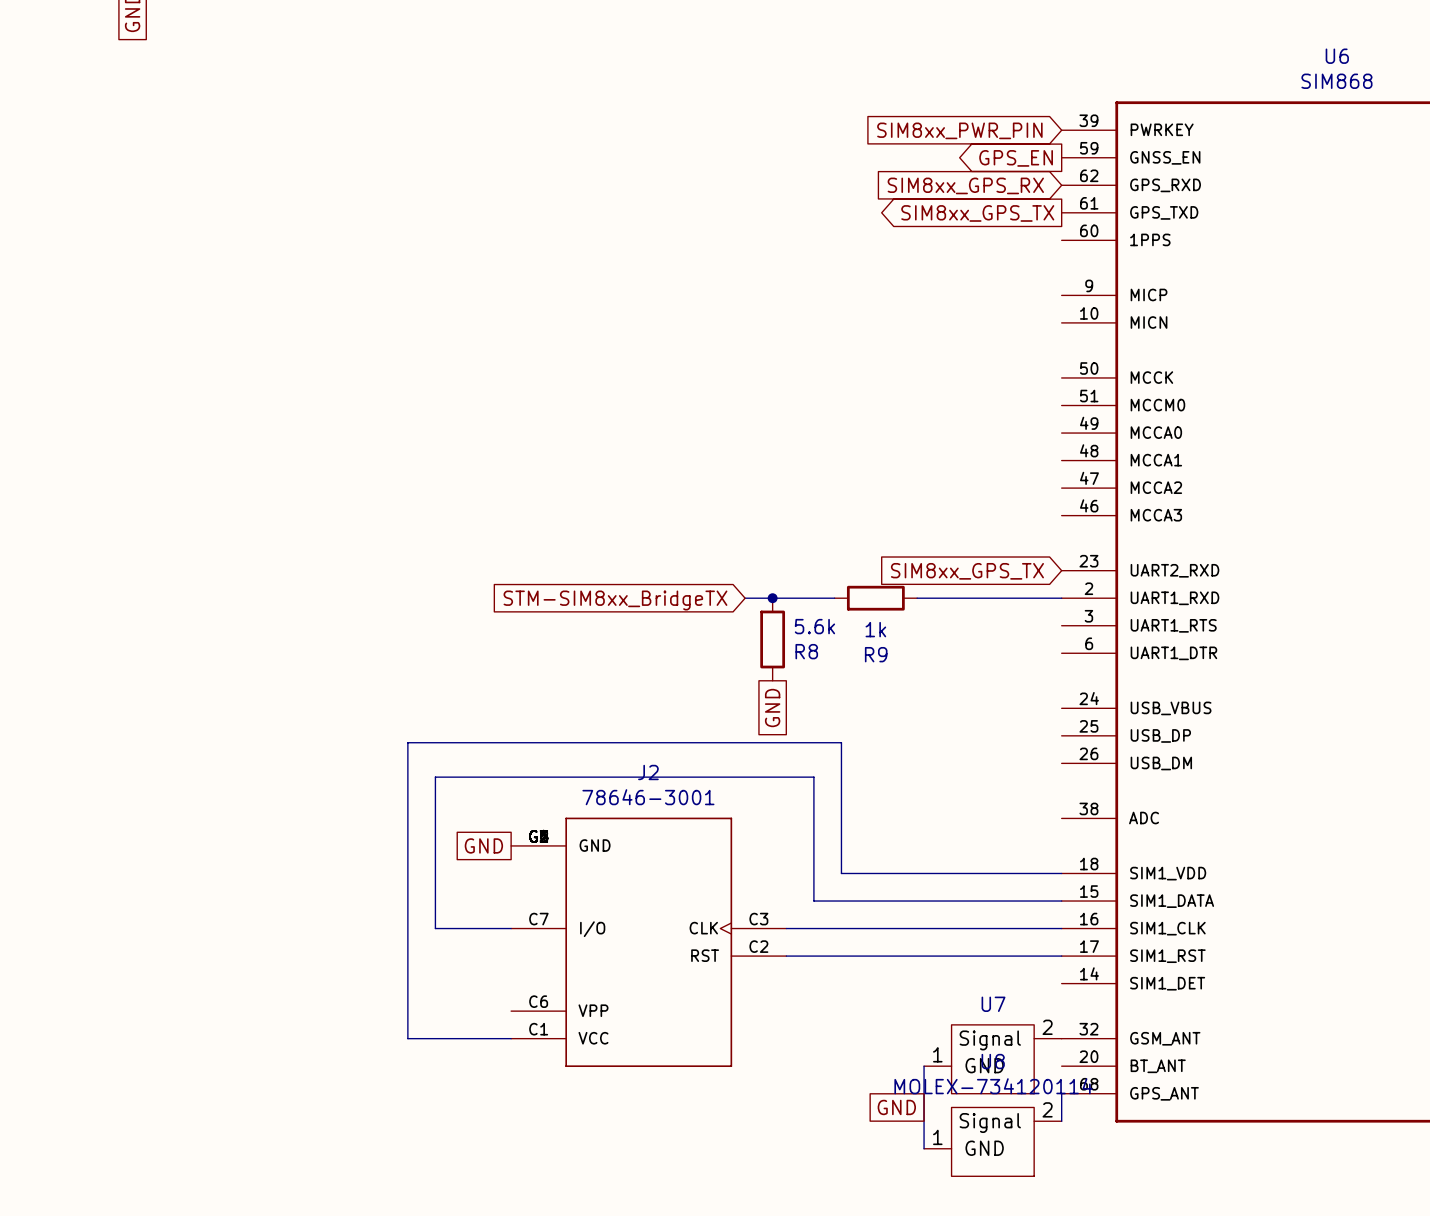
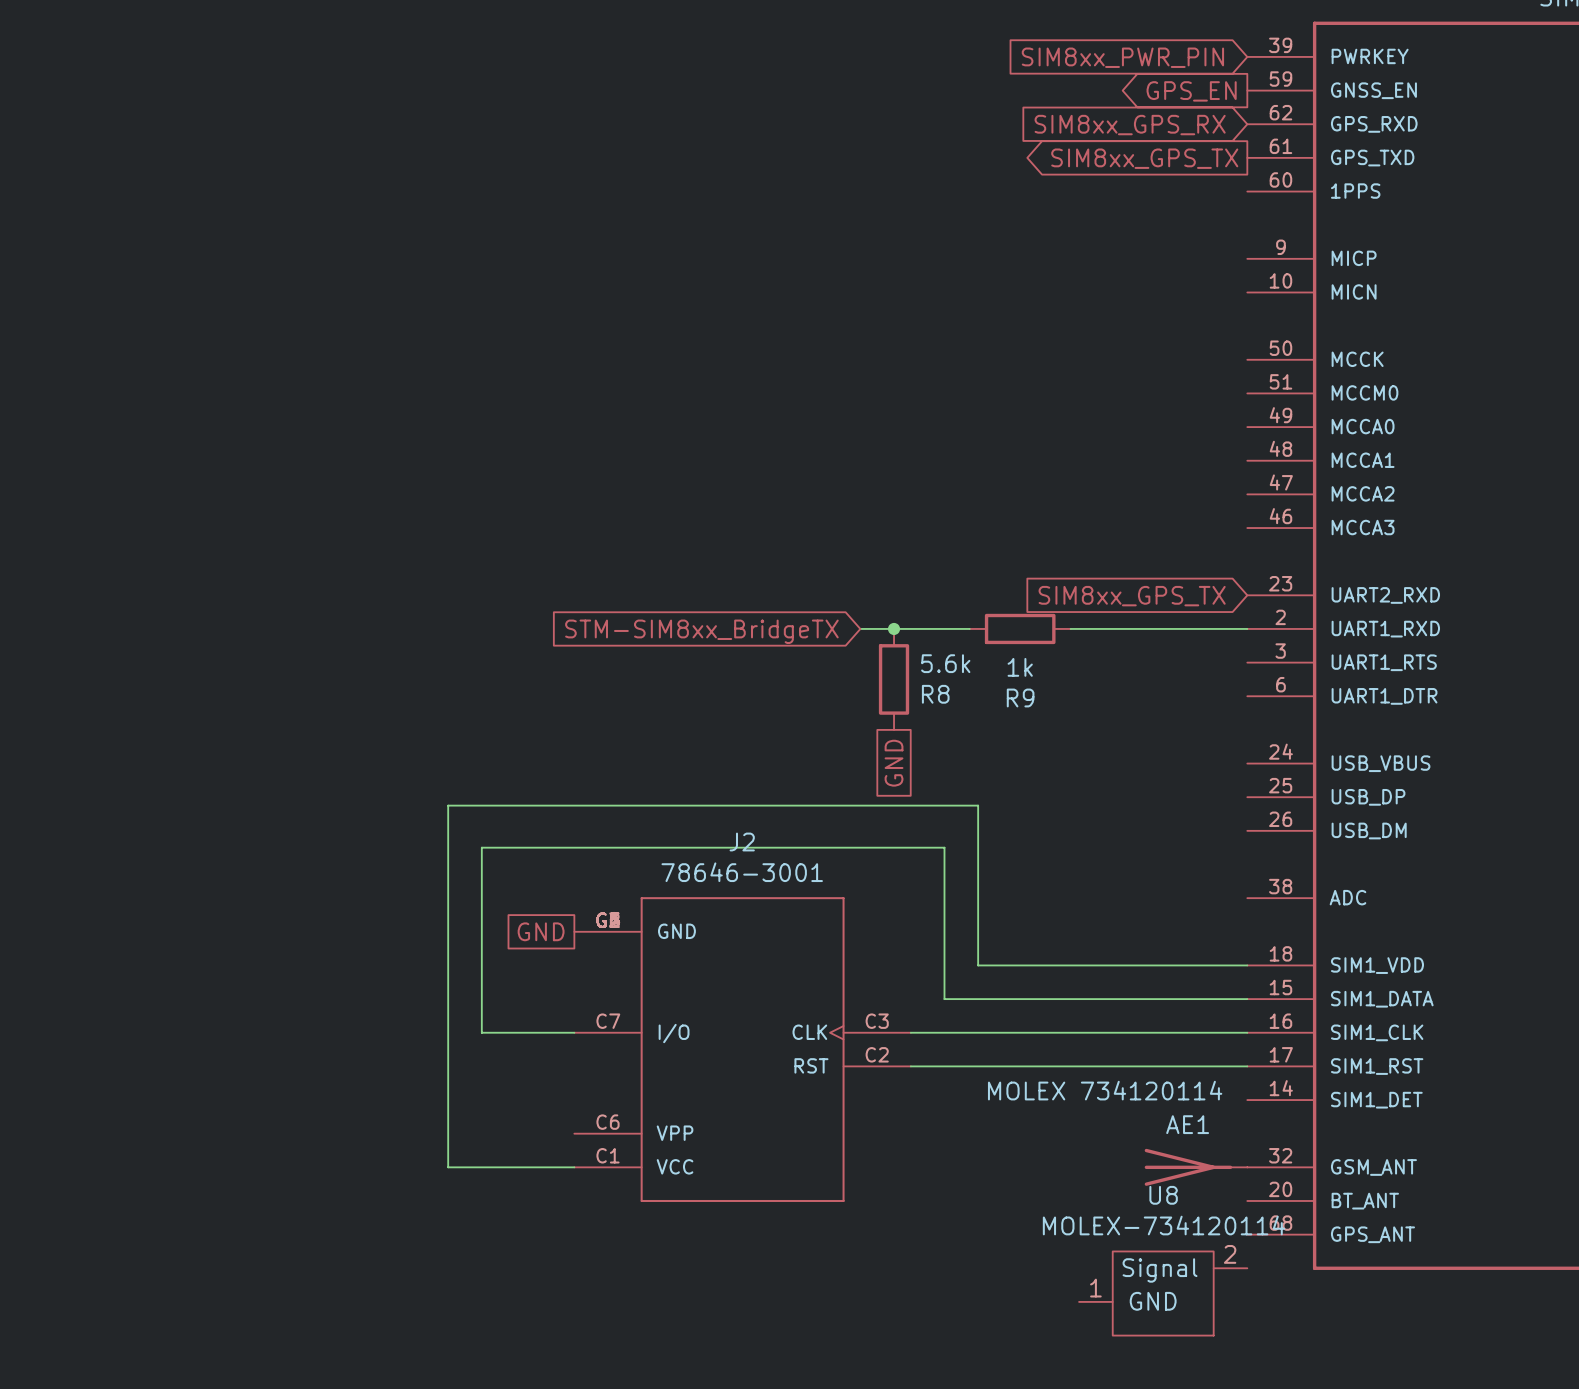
AE1: none -> MOLEX 734120114 (1196, 1167)
U7: (992, 1059) -> none
wire: (924, 1066) (924, 1148) -> none
wire: (1061, 1093) (1061, 1121) -> none
global label: GND (896, 1107) -> none

